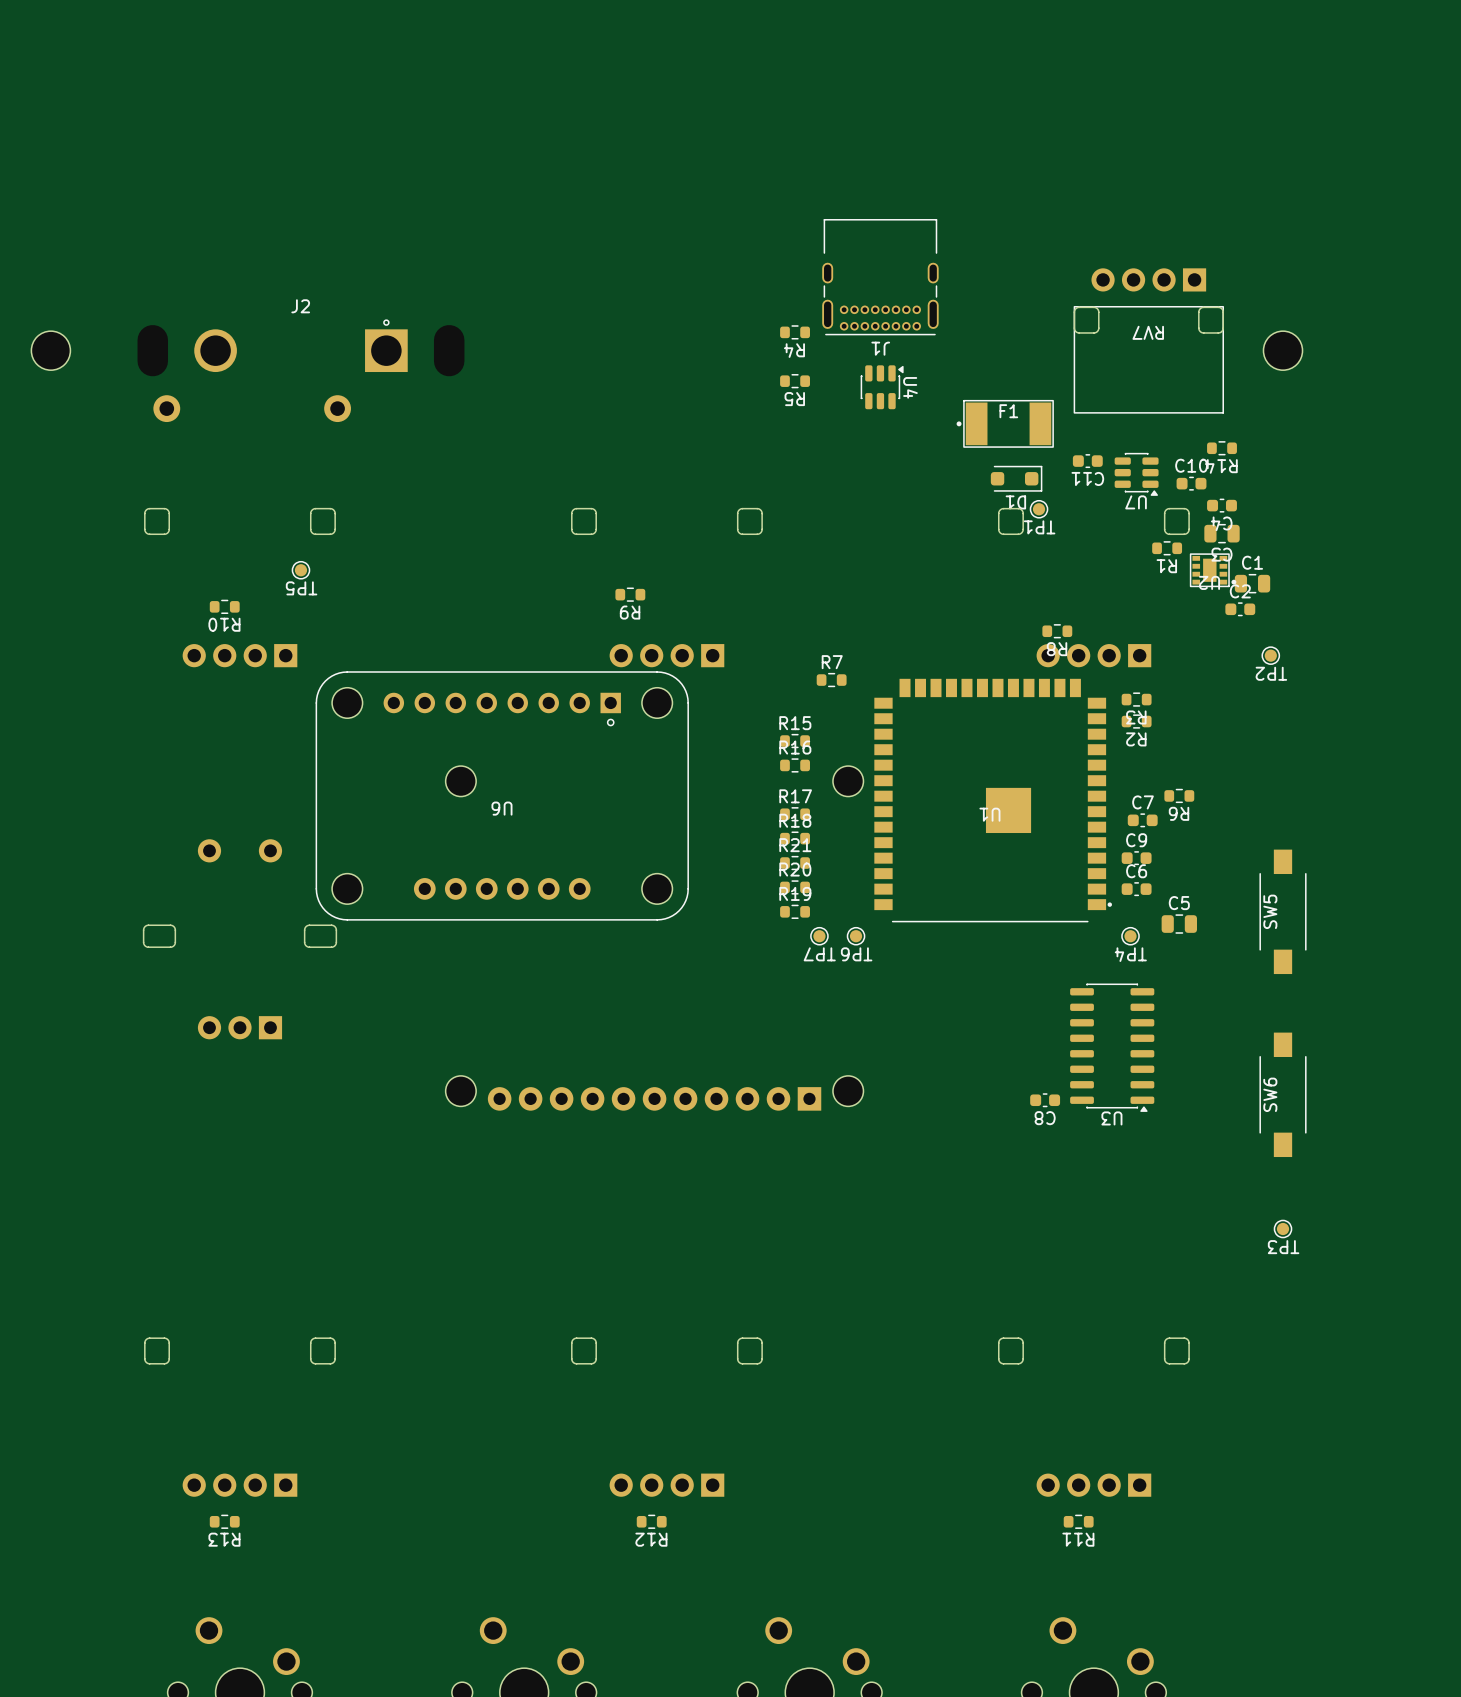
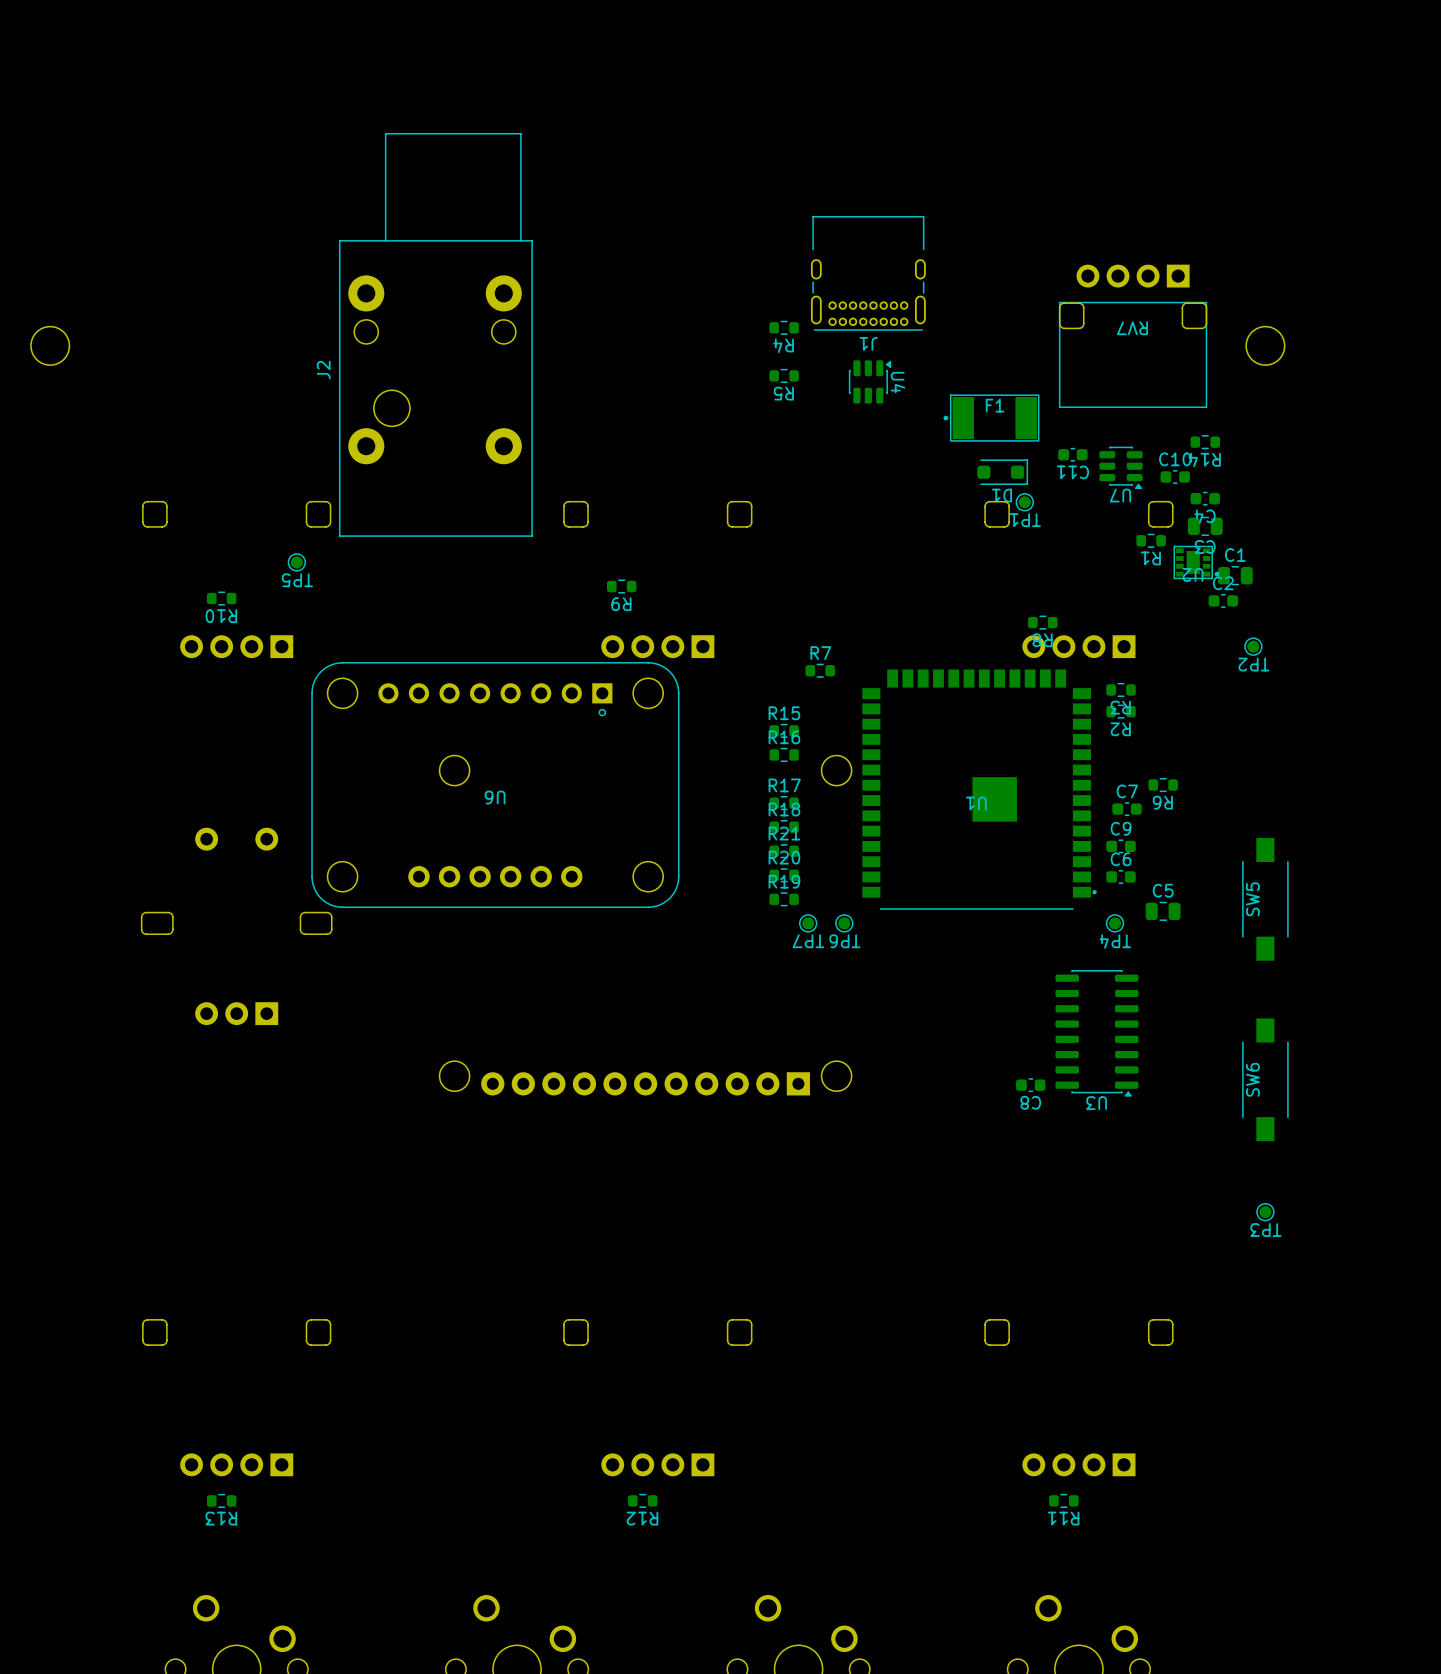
J2 name position: J2 (300, 306) -> J2 (323, 370)
J2 footprint: [137, 319, 465, 423] -> [338, 133, 533, 537]

